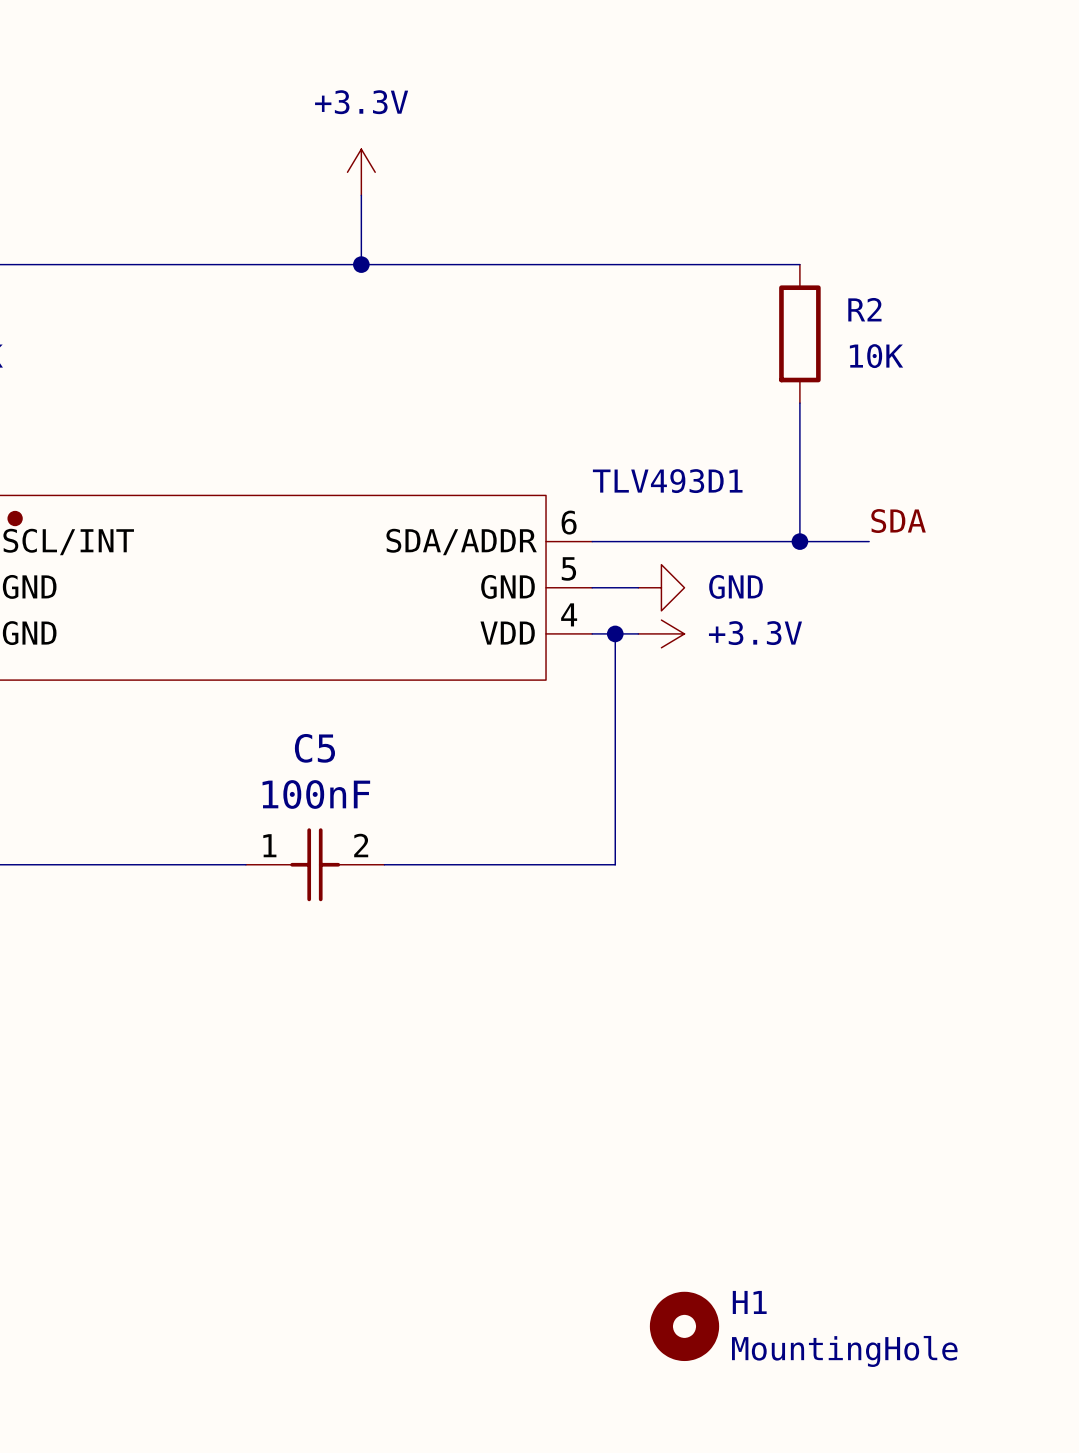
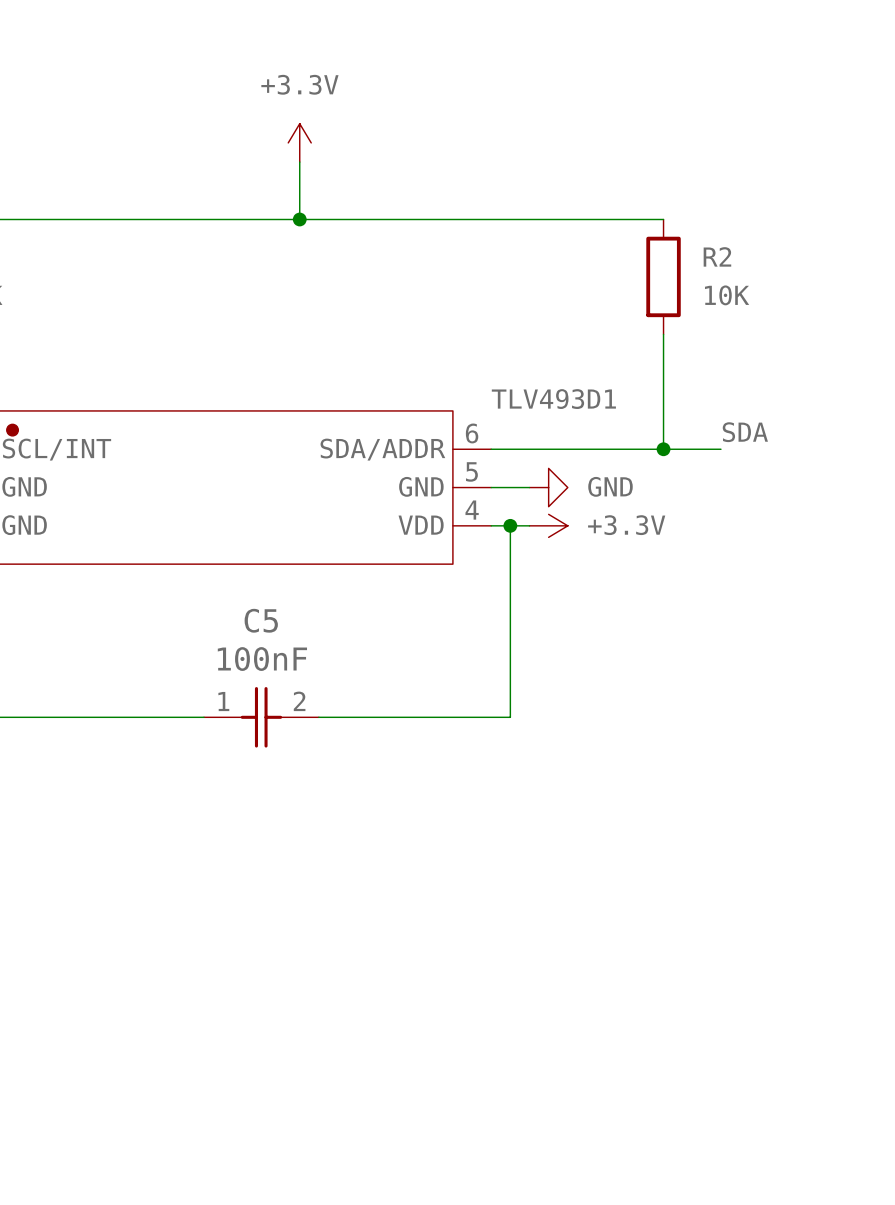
H1: MountingHole (684, 1326) -> none

